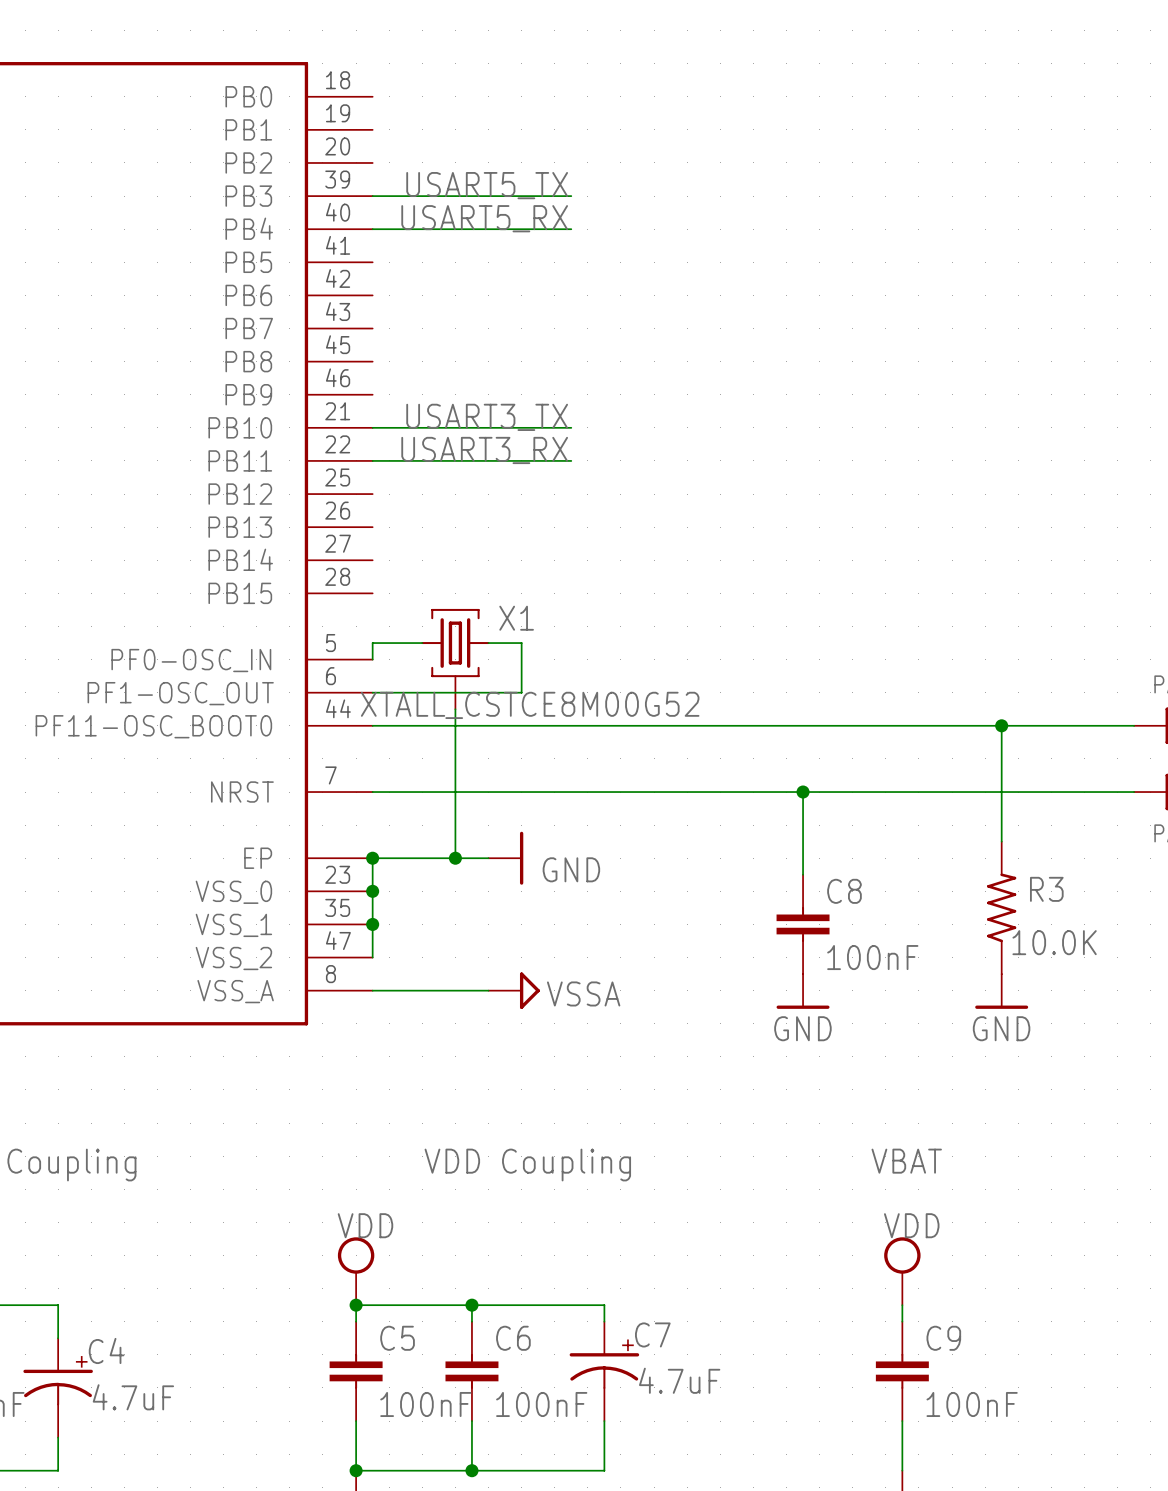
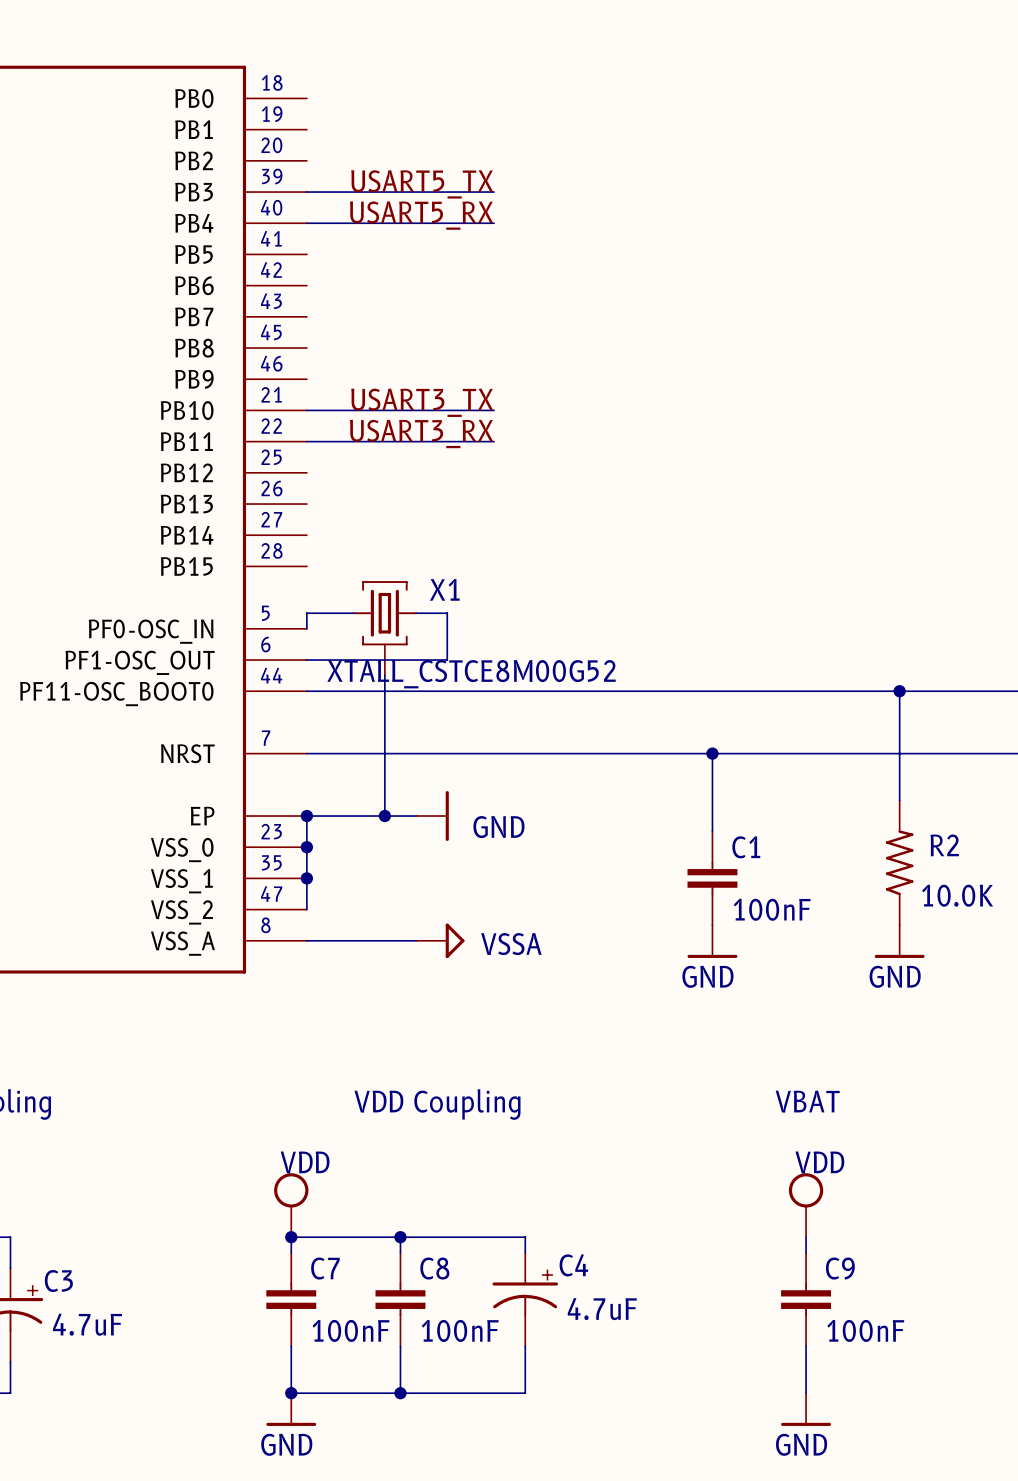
R3 name: R3 (1046, 889) -> R2 (944, 845)
C8 name: C8 (844, 891) -> C1 (746, 847)
C7 name: C7 (652, 1334) -> C4 (573, 1265)
C5 name: C5 (397, 1338) -> C7 (325, 1268)
C6 name: C6 (513, 1338) -> C8 (434, 1268)
C4 name: C4 (106, 1350) -> C3 (58, 1281)

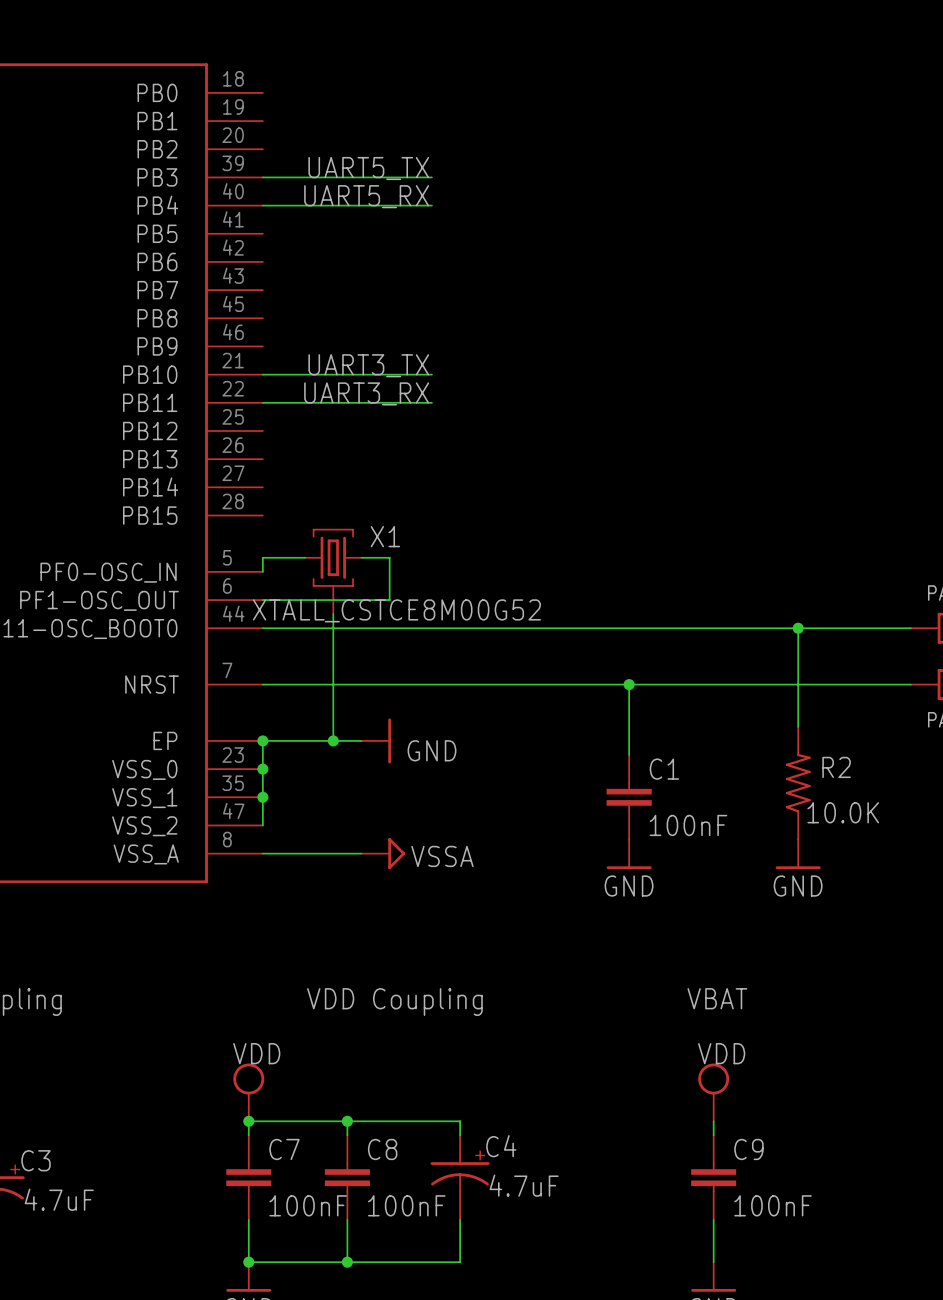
label: USART5_TX (422, 184) -> UART5_TX (368, 168)
label: USART5_RX (421, 215) -> UART5_RX (366, 196)
label: USART3_TX (422, 402) -> UART3_TX (368, 365)
label: USART3_RX (421, 433) -> UART3_RX (366, 393)

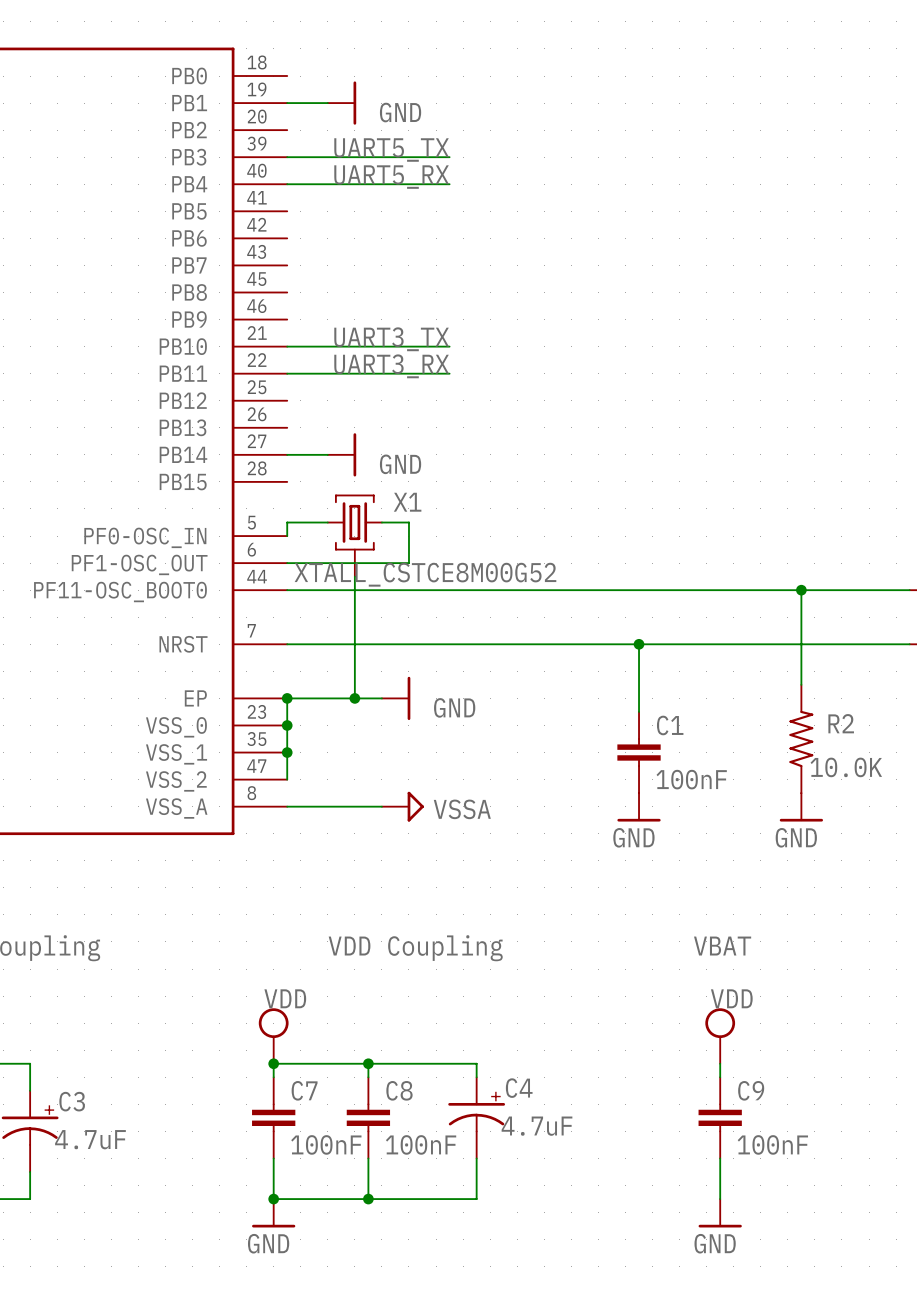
wire: none -> (287, 103) (327, 103)
power symbol: none -> GND (342, 103)
wire: none -> (287, 454) (327, 454)
power symbol: none -> GND (342, 454)

